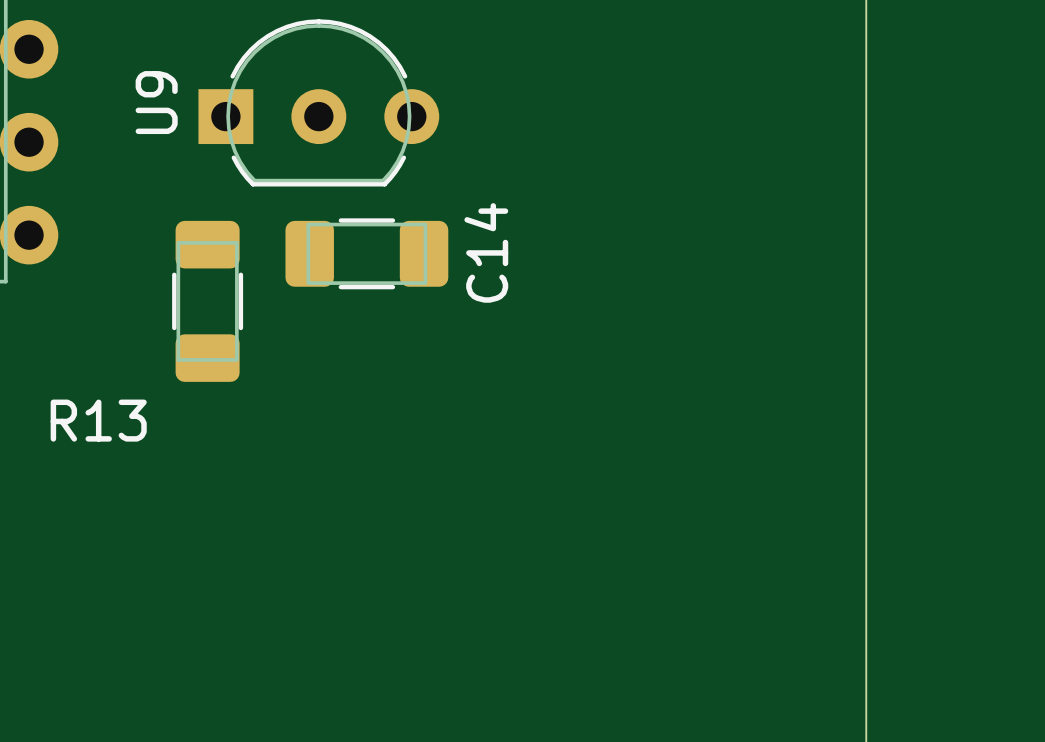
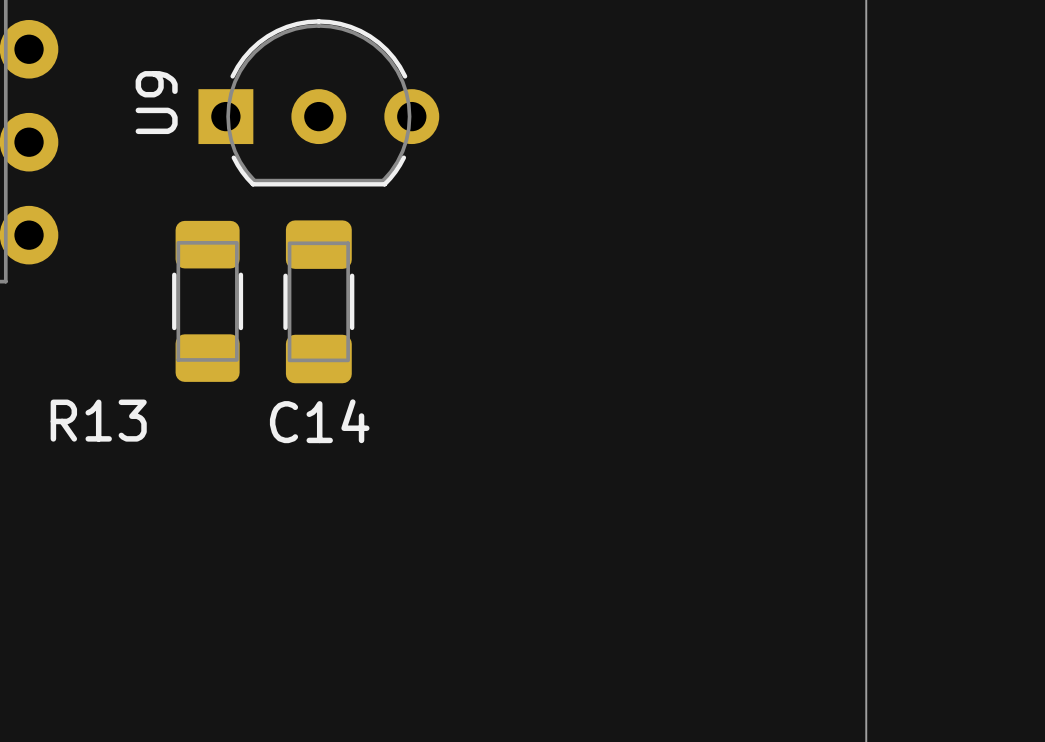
C14 rotation: 0° (366, 253) -> 90° clockwise (318, 301)

